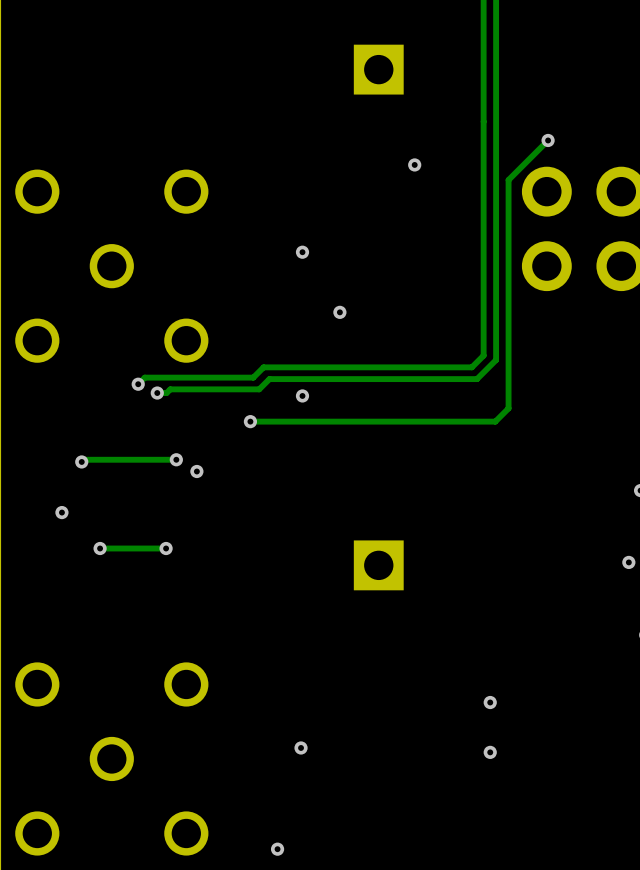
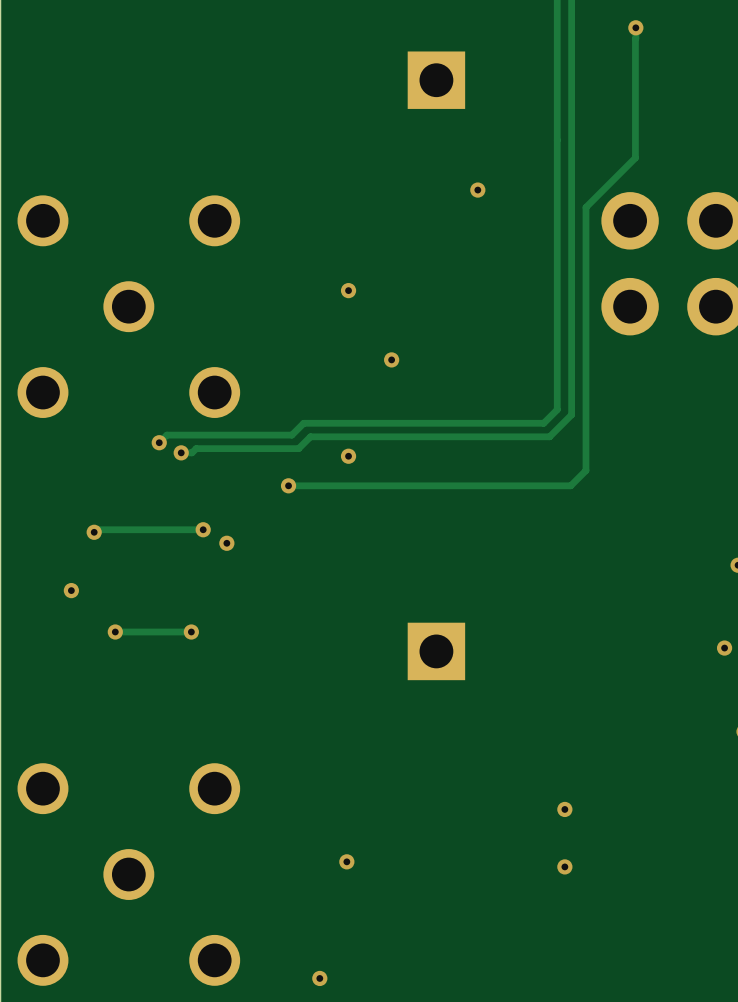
track: none -> (635, 38) (635, 157) (631, 161)
via position: (548, 140) -> (635, 27)

